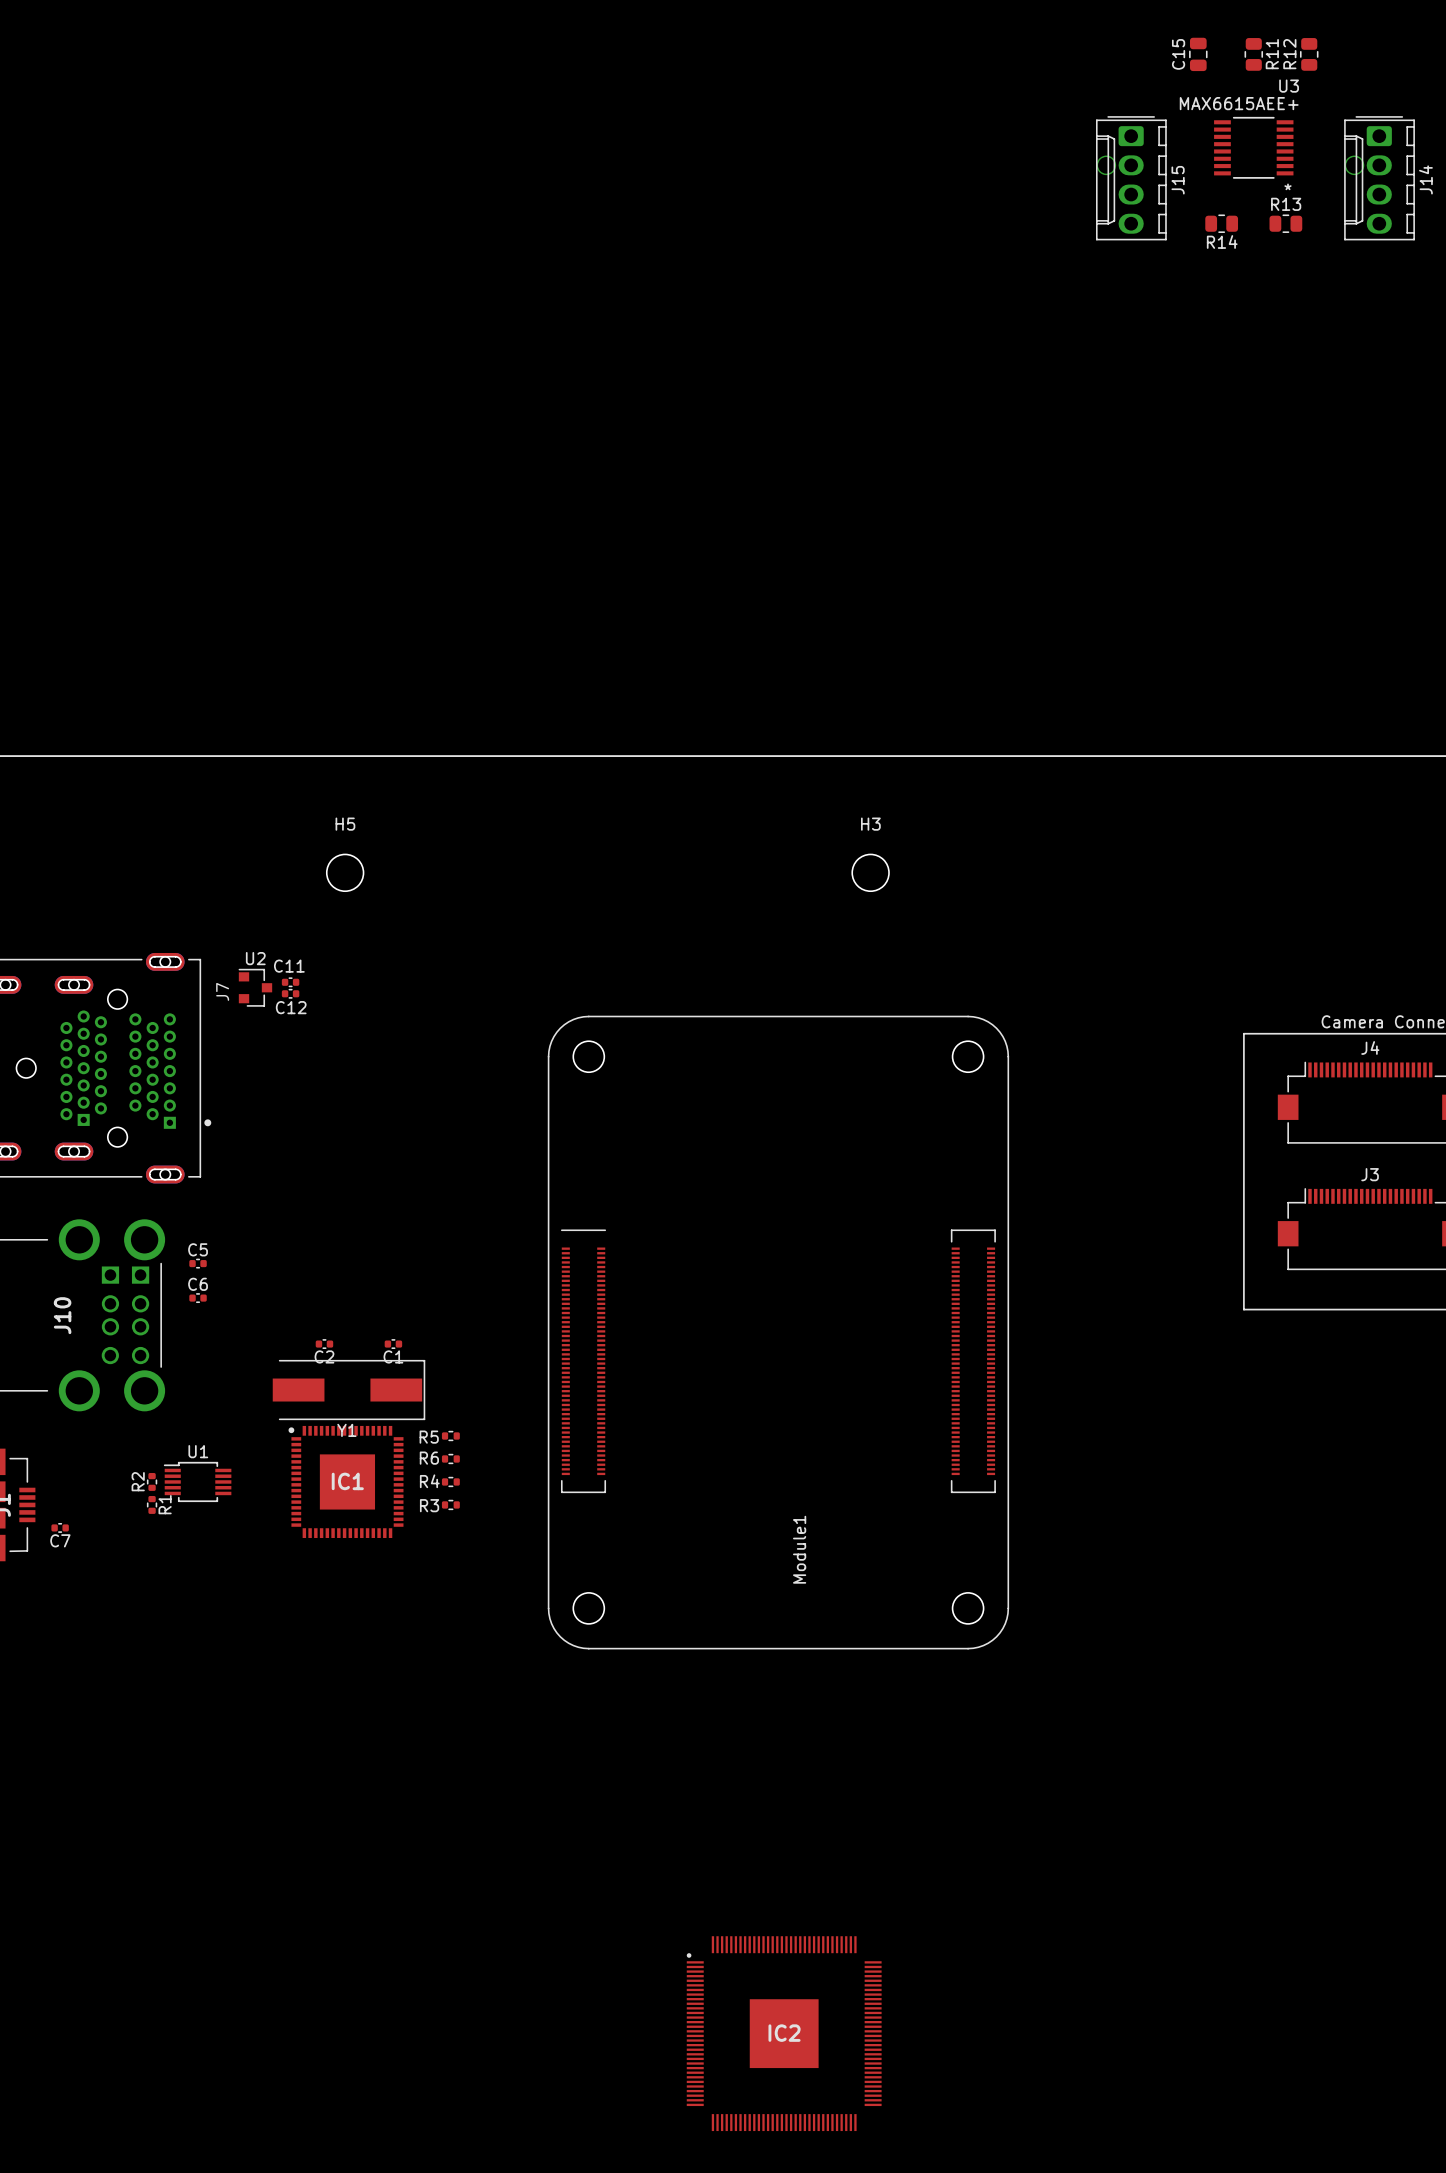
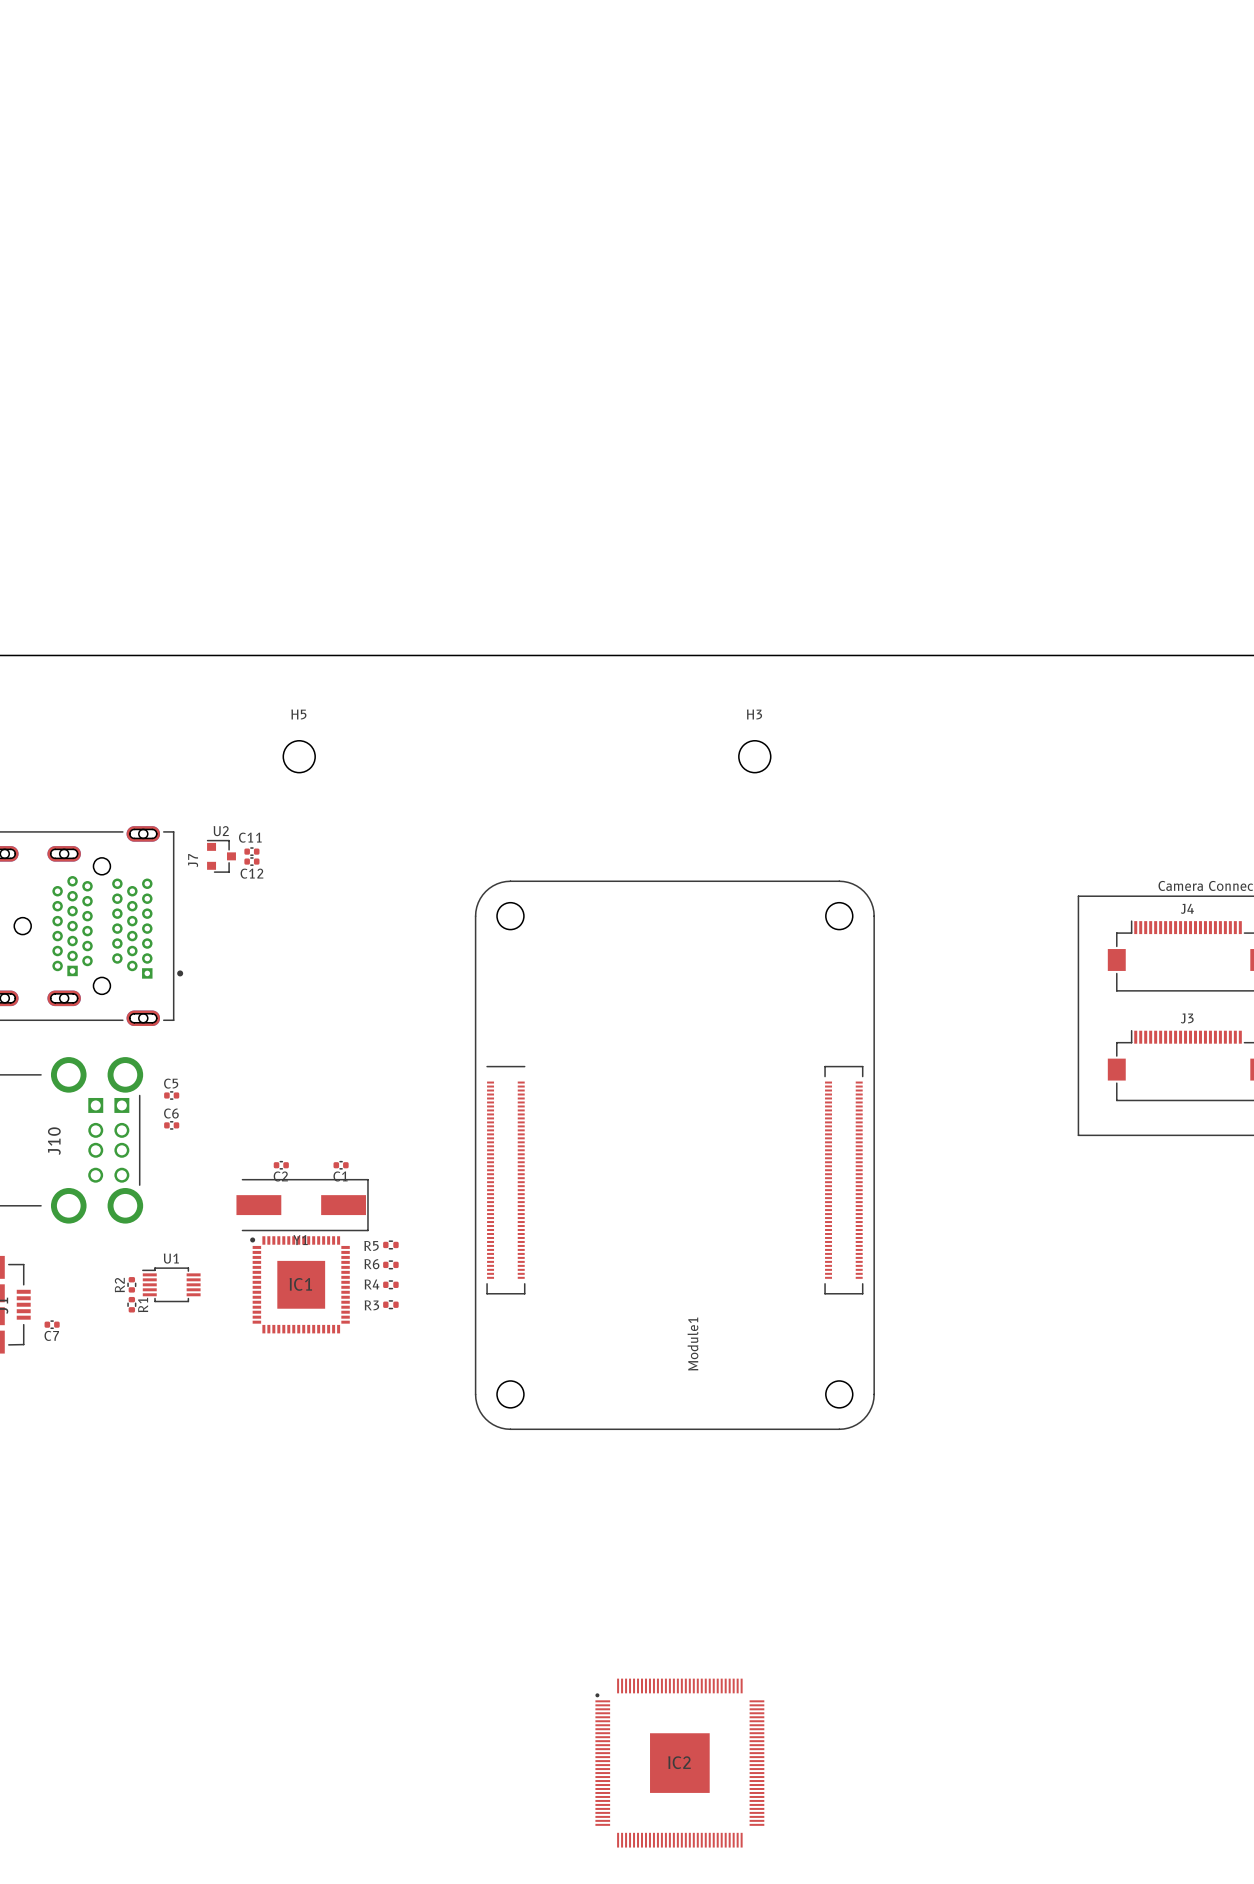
C15: (1198, 54) -> none
R11: (1253, 54) -> none
R12: (1309, 54) -> none
U3: MAX6615AEE+ (1253, 147) -> none
J15: (1131, 178) -> none
J14: (1379, 178) -> none
R14: (1221, 223) -> none
R13: (1285, 223) -> none

